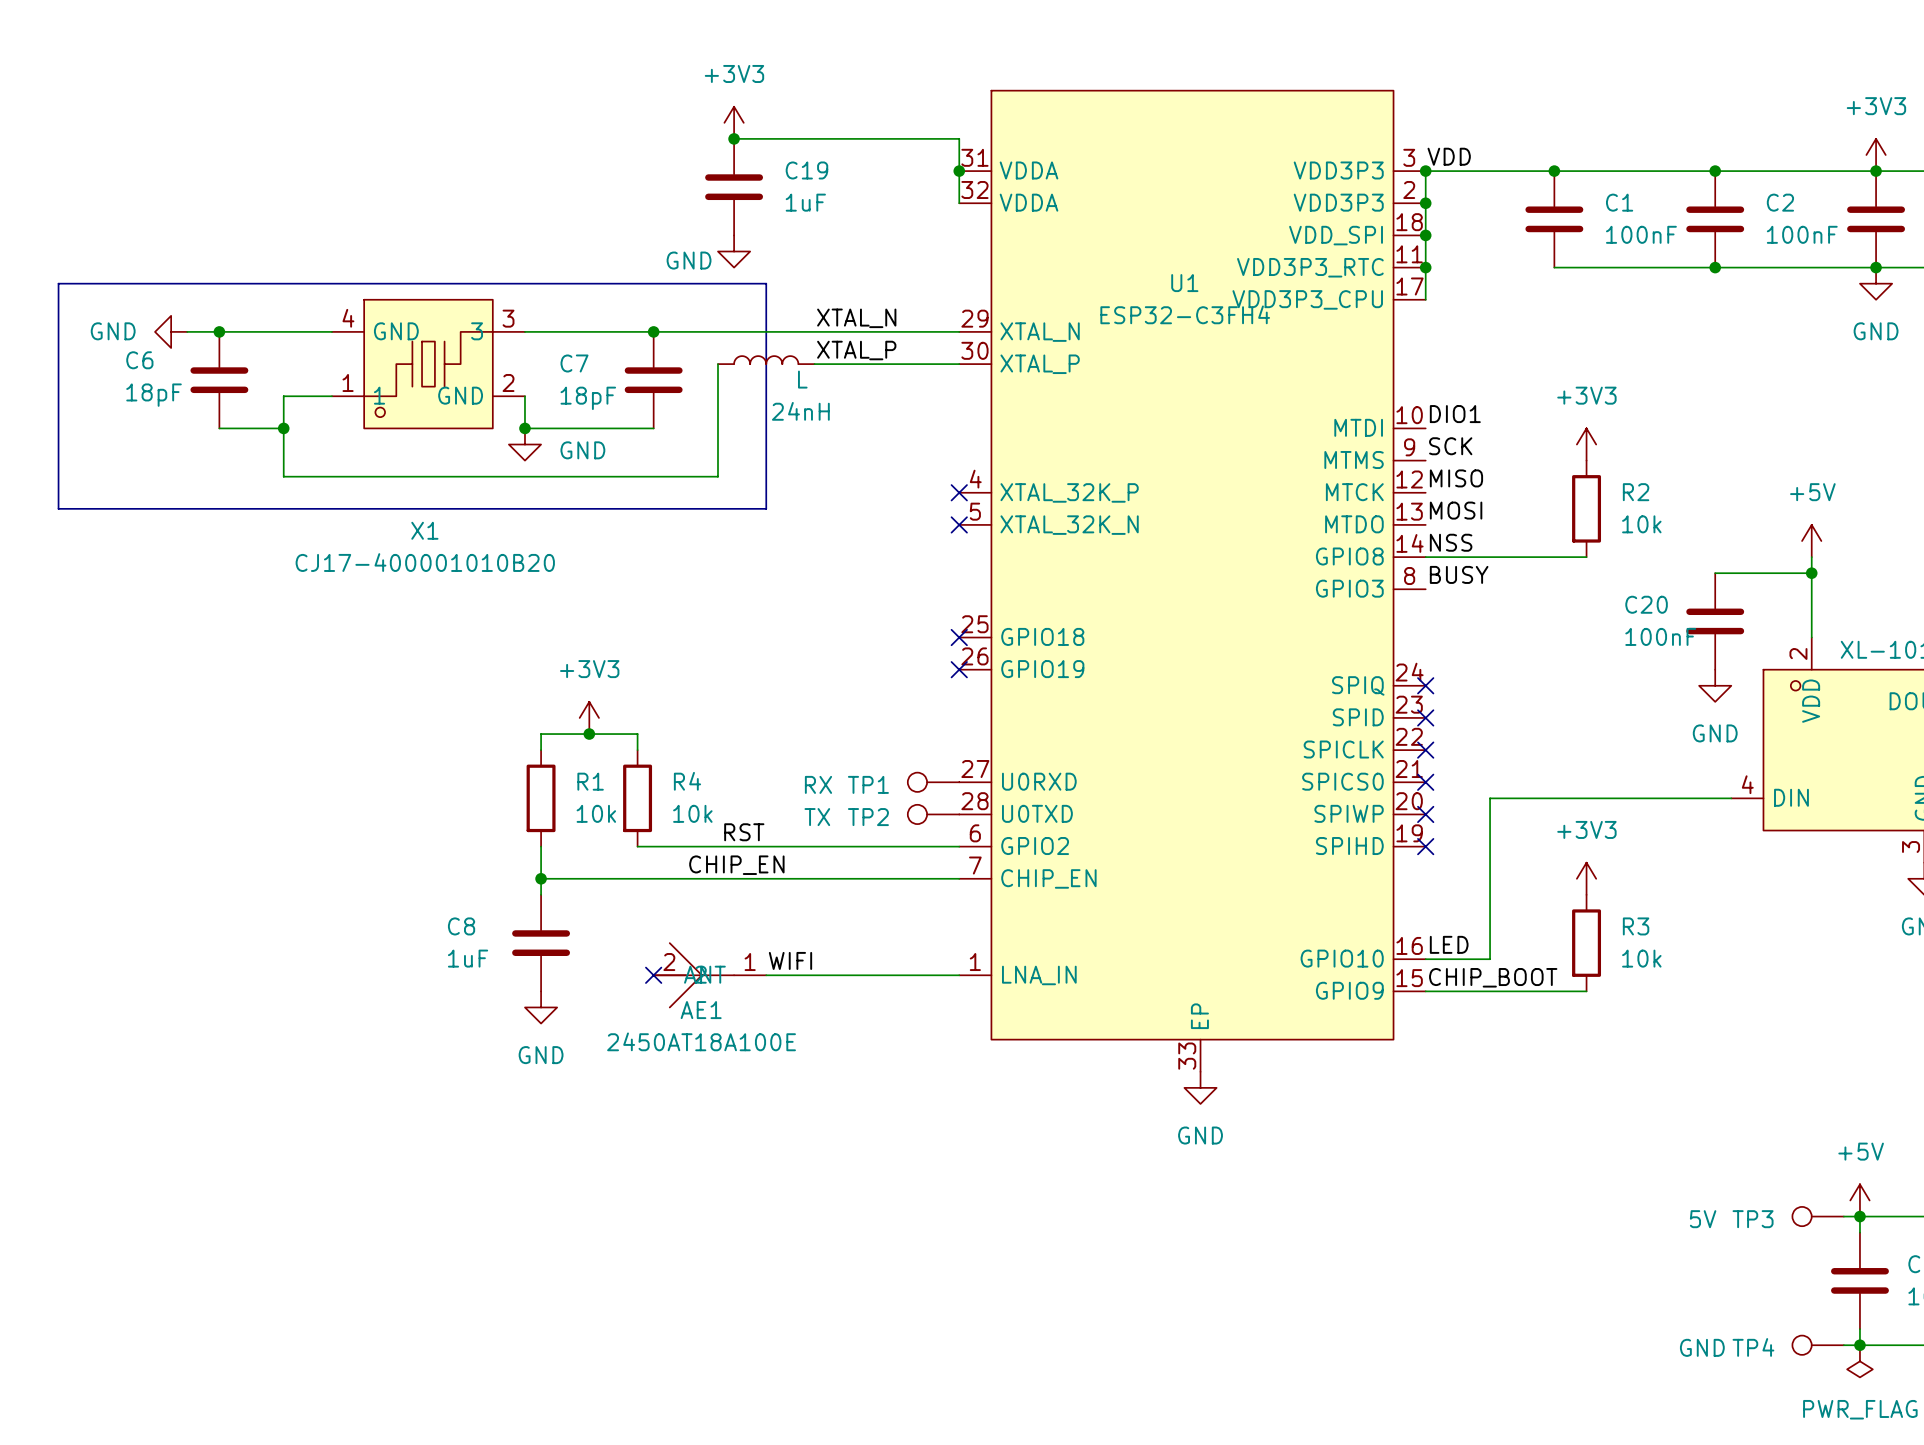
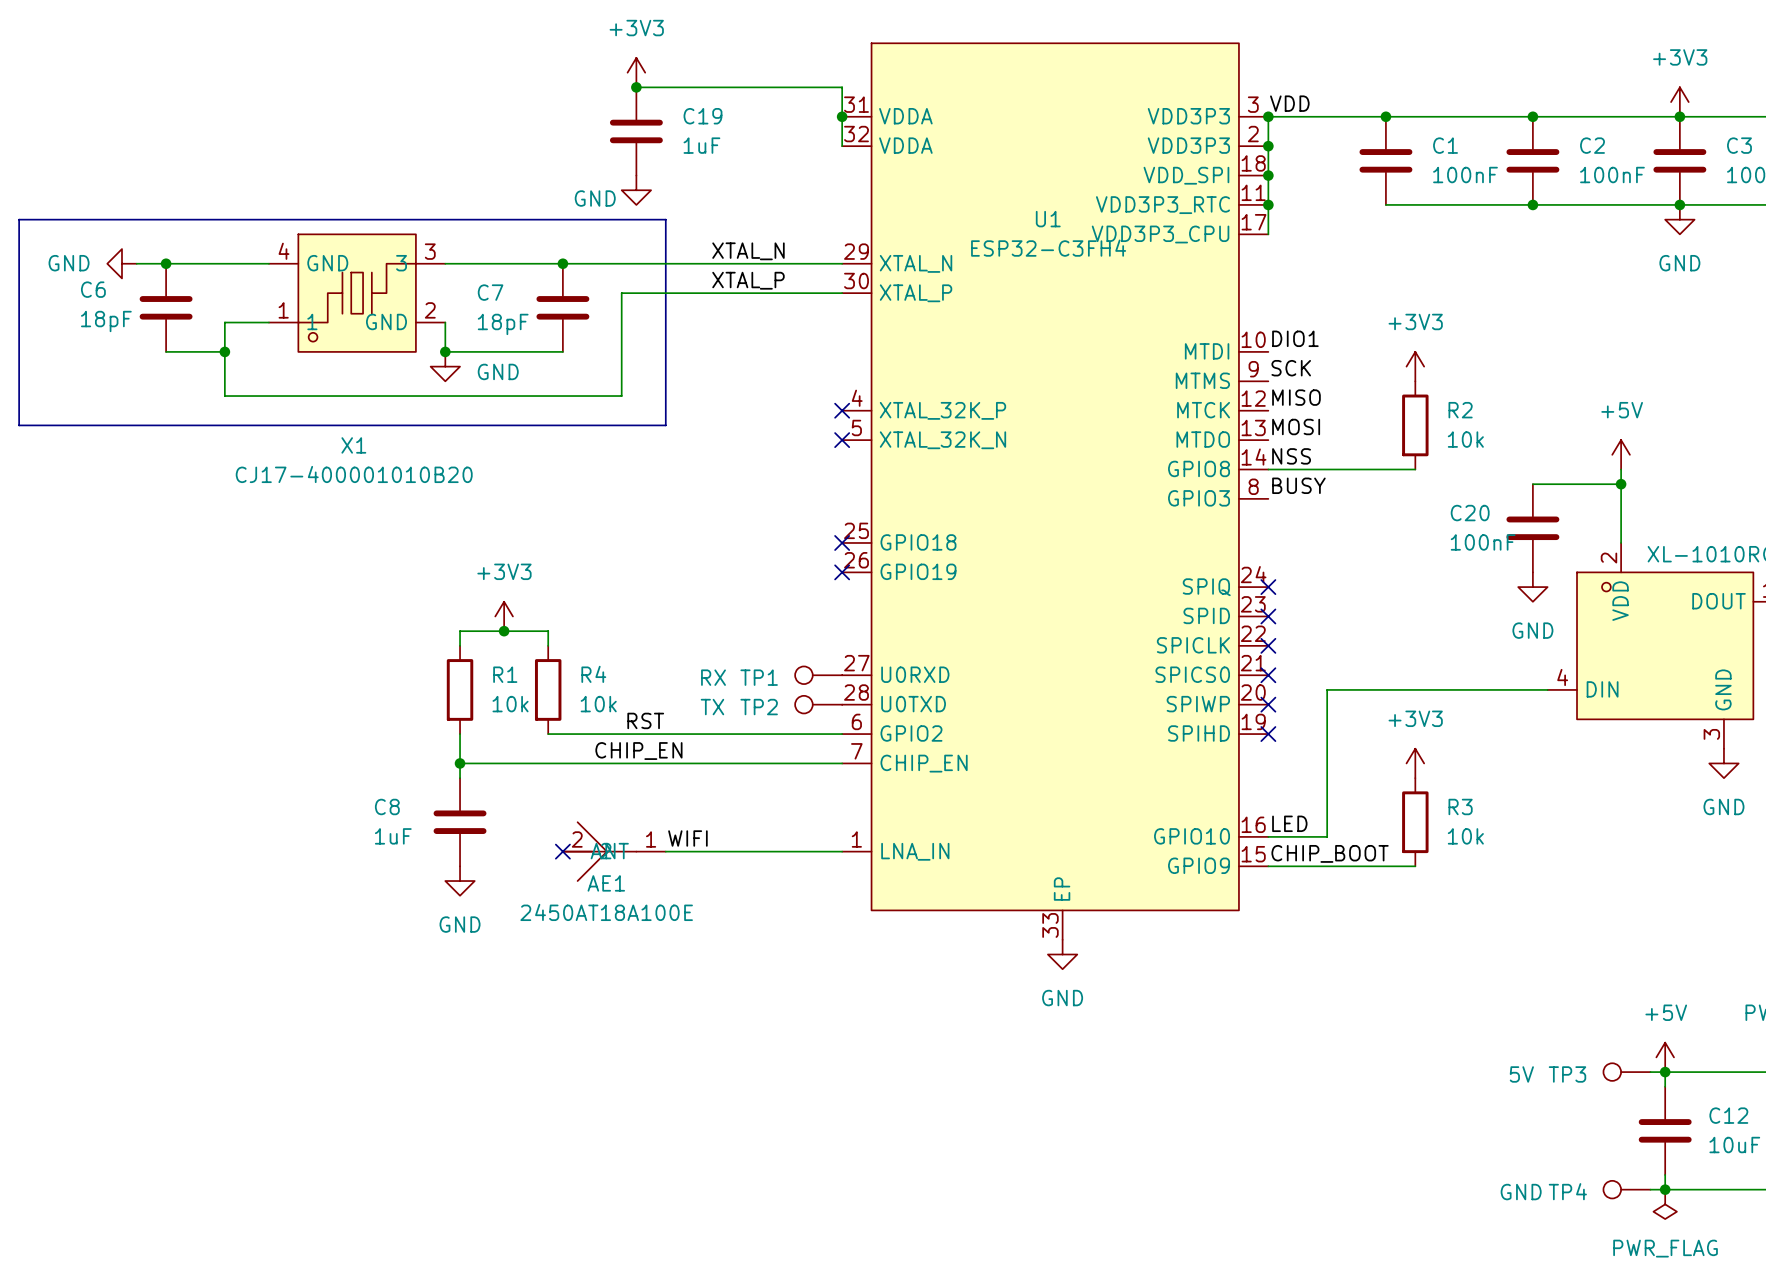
L: 24nH (766, 360) -> none
wire: none -> (621, 293) (709, 293)

